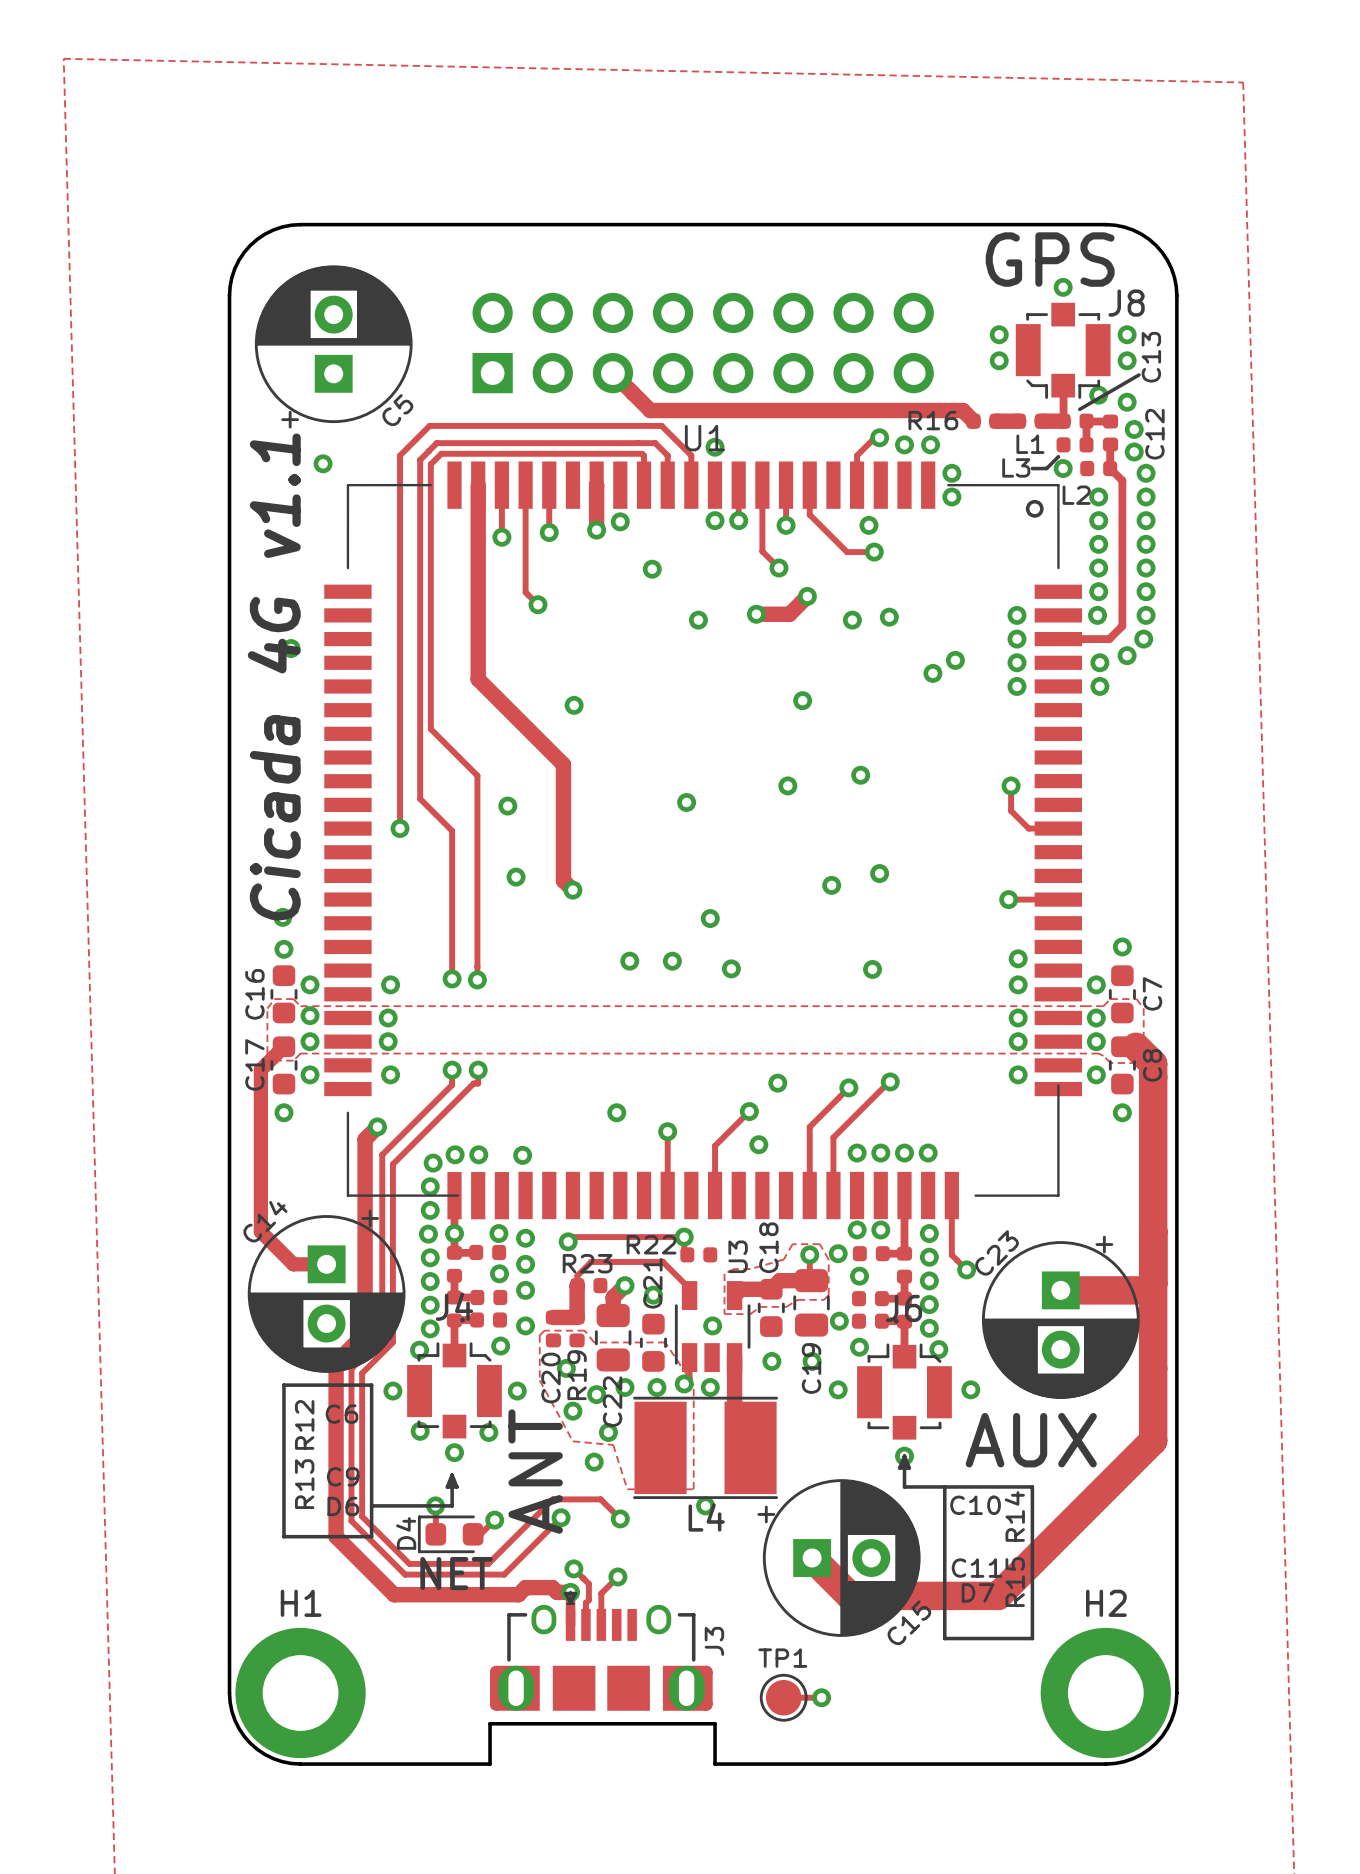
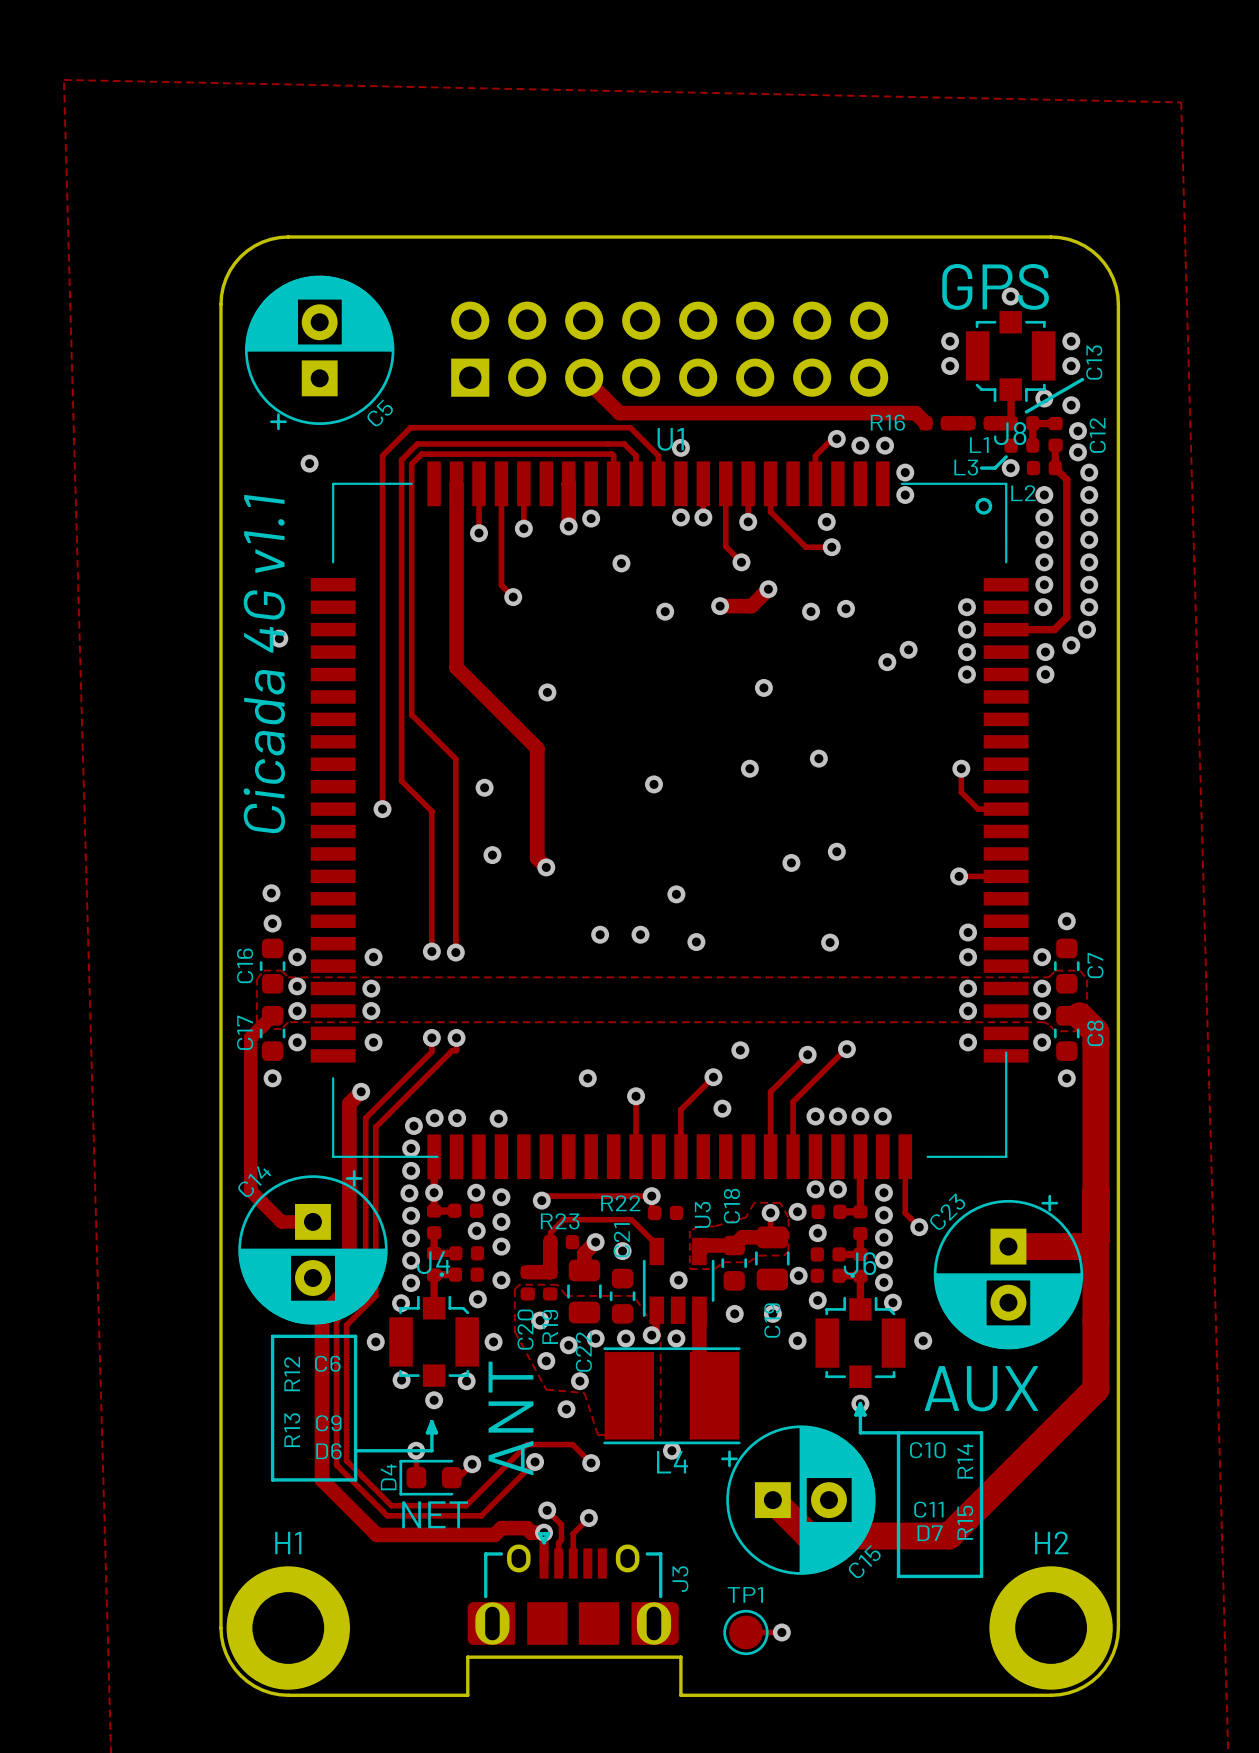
text position: GPS (1050, 259) -> GPS (995, 286)
J8 name position: J8 (1126, 303) -> J8 (1010, 433)

